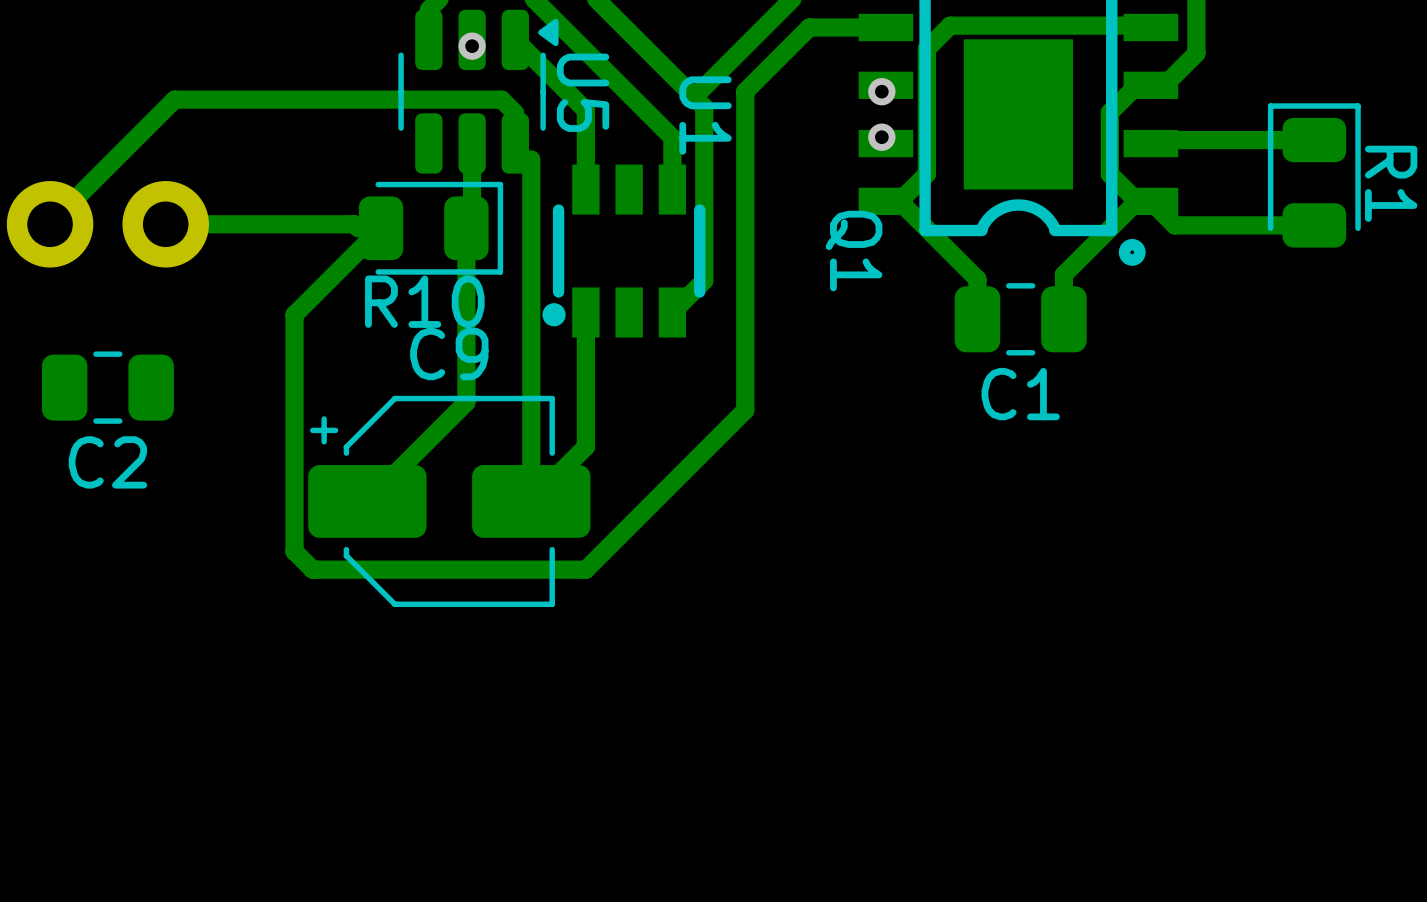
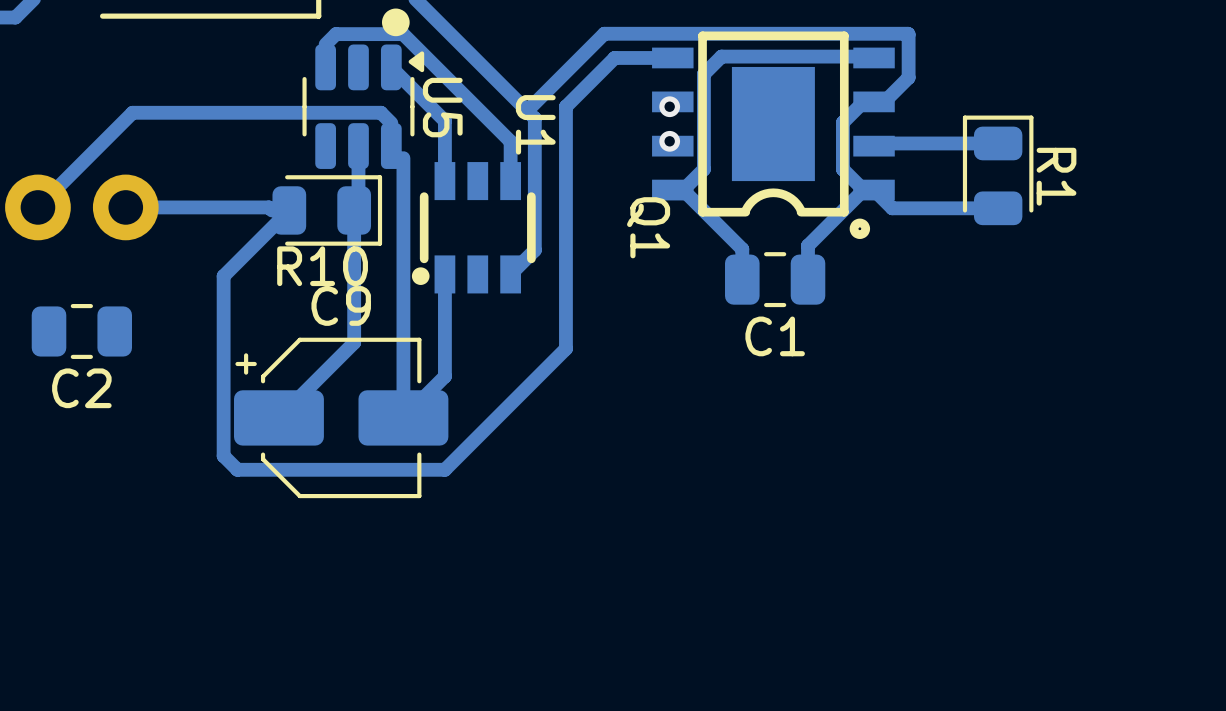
via: (472, 46) -> none

